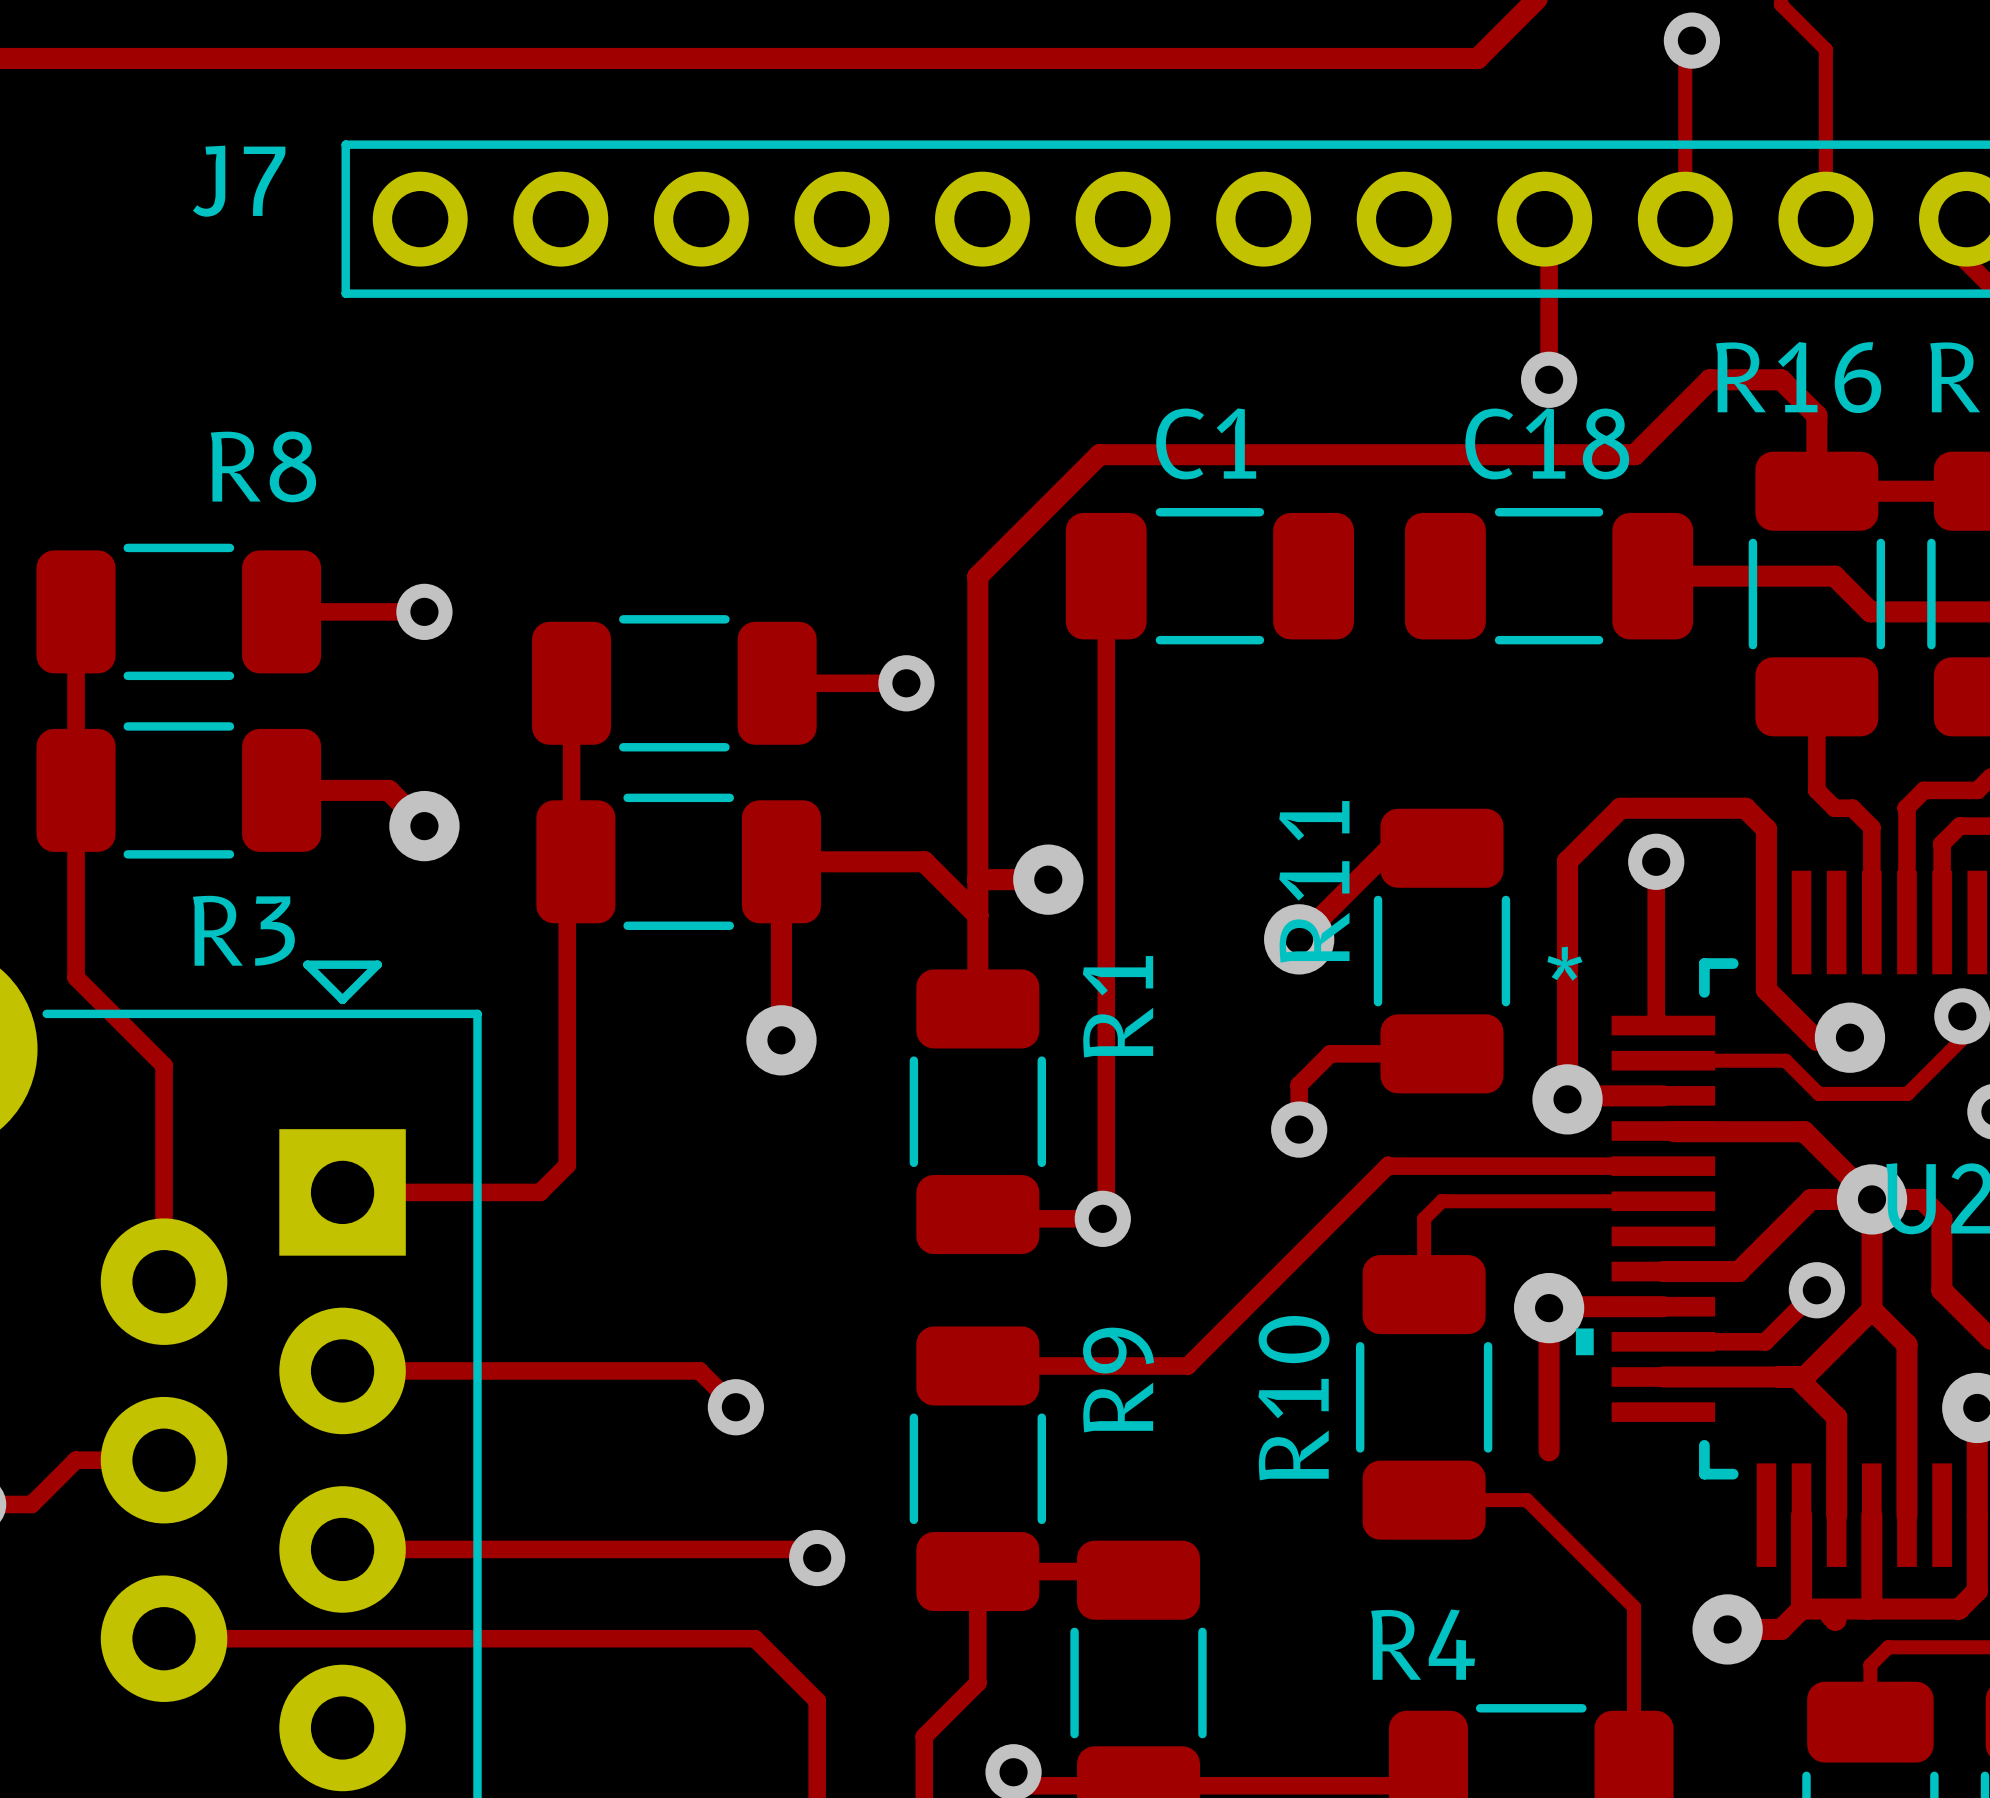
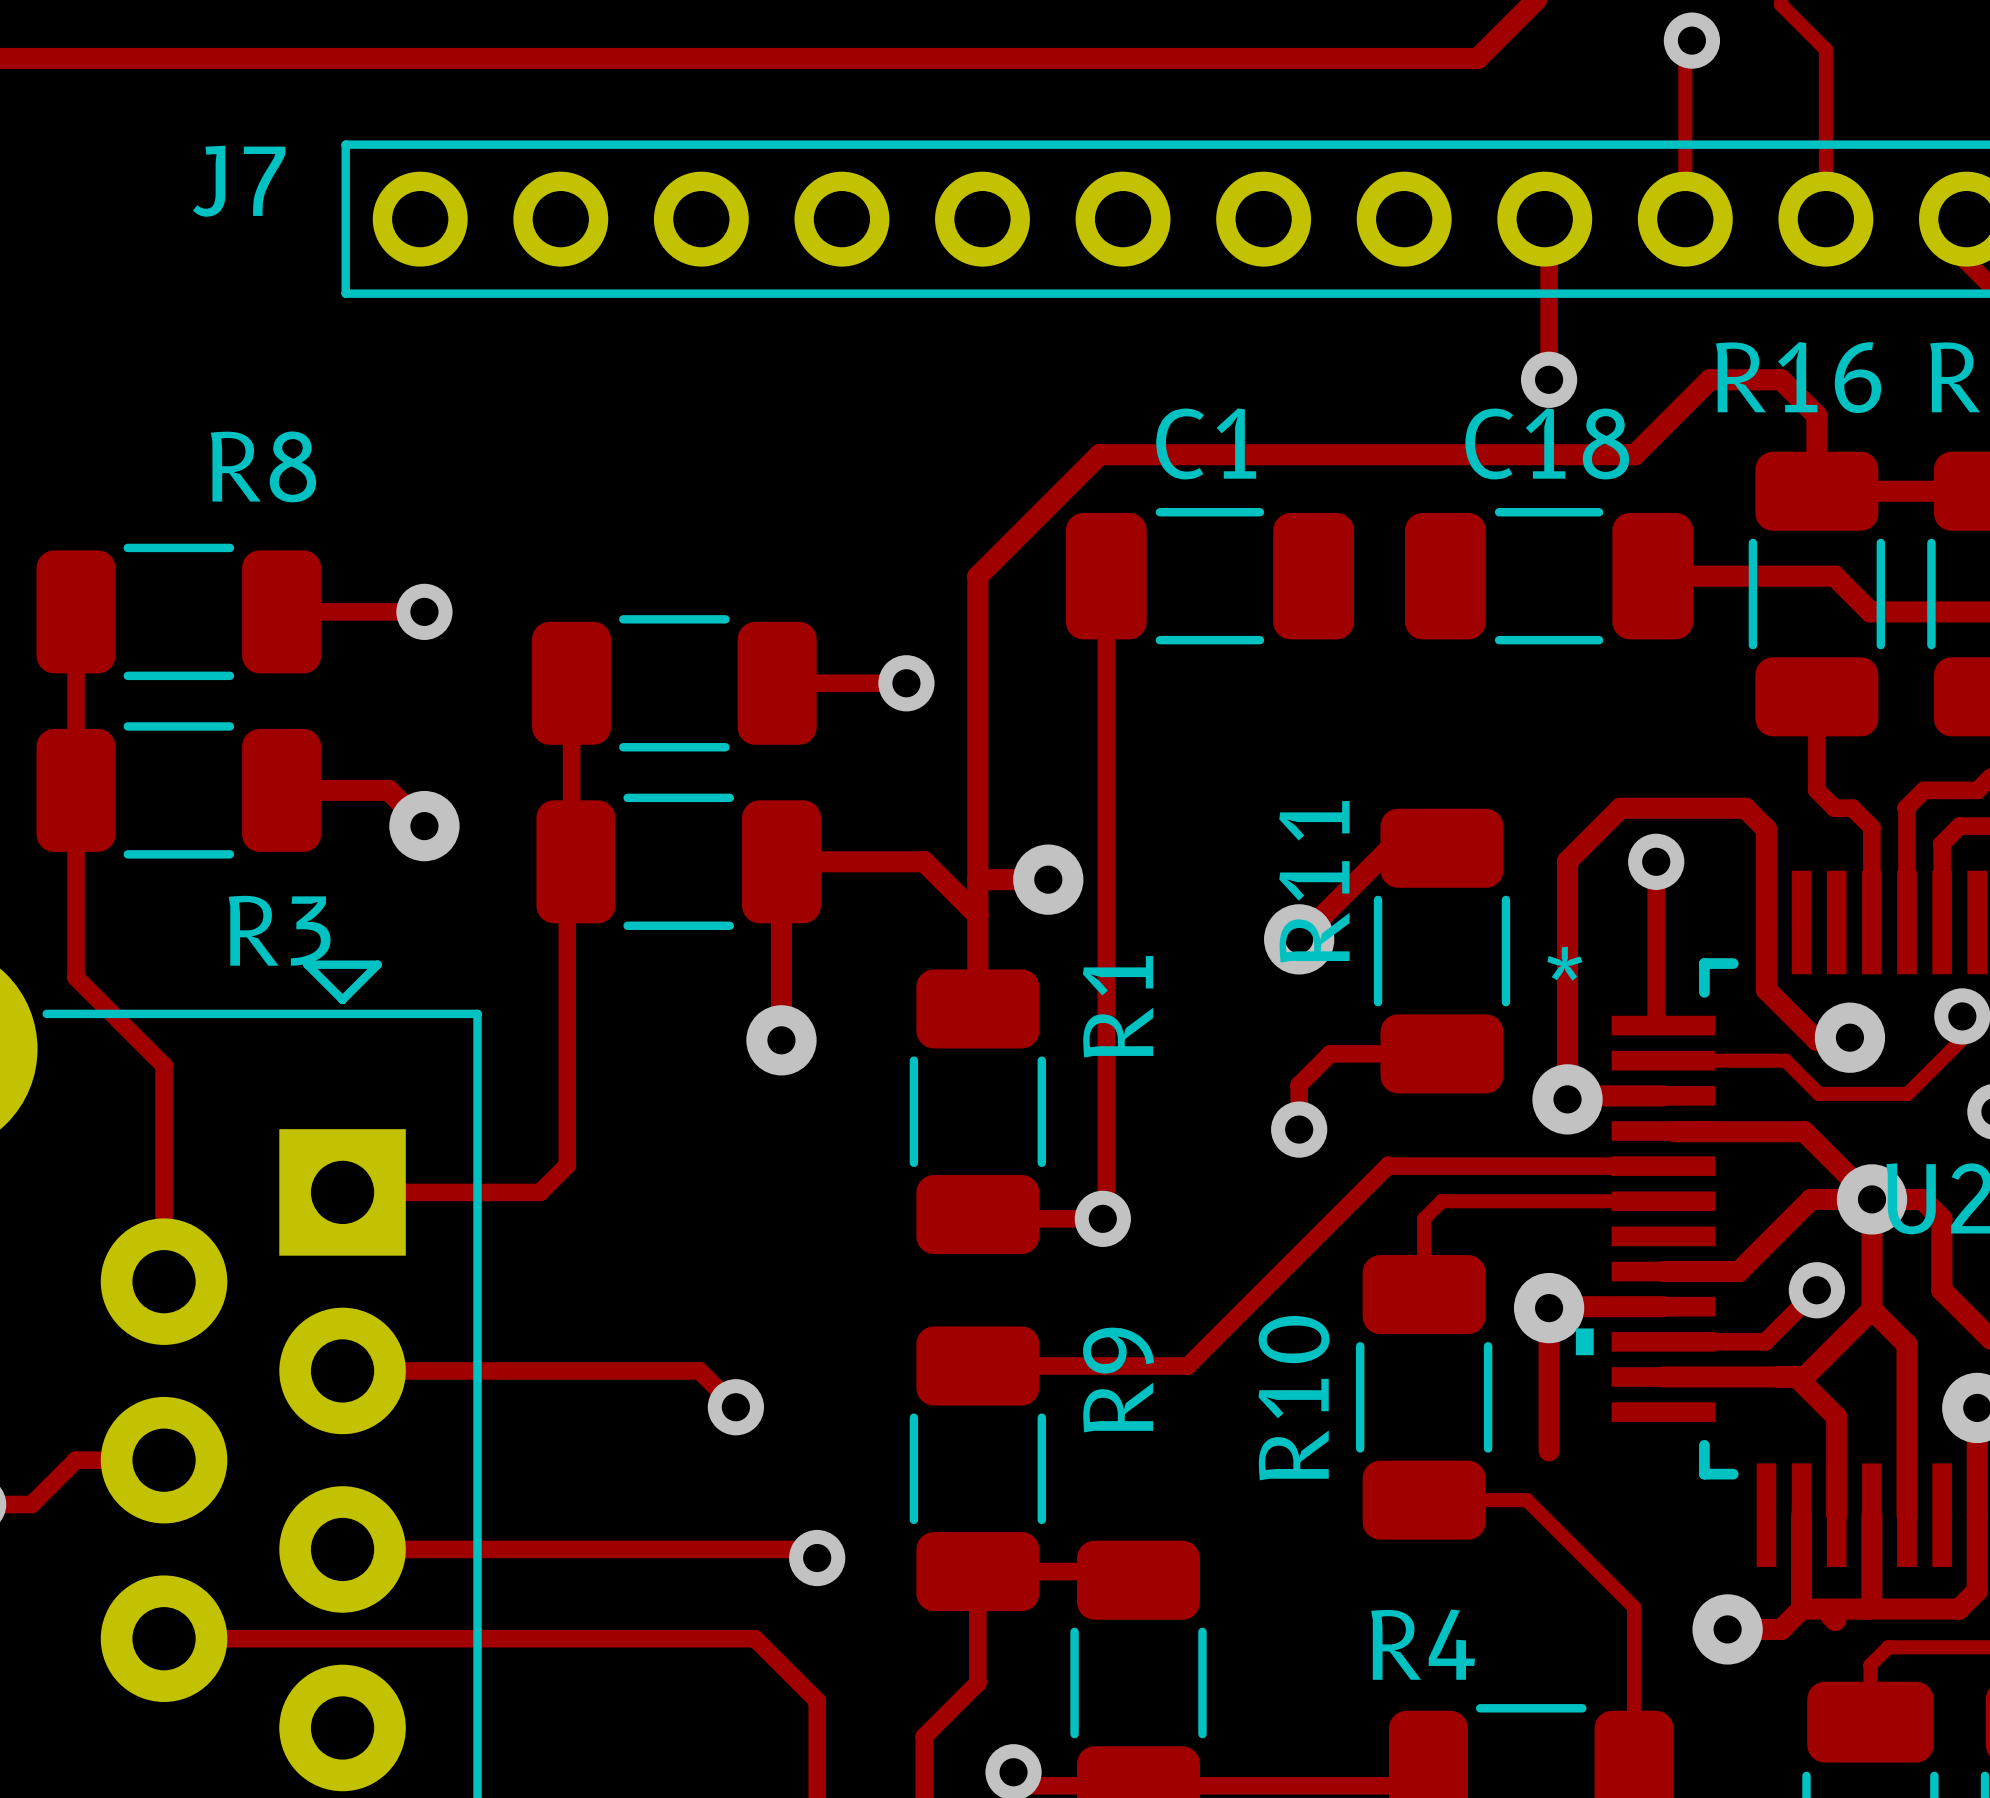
R3 name position: R3 (243, 930) -> R3 (279, 930)

